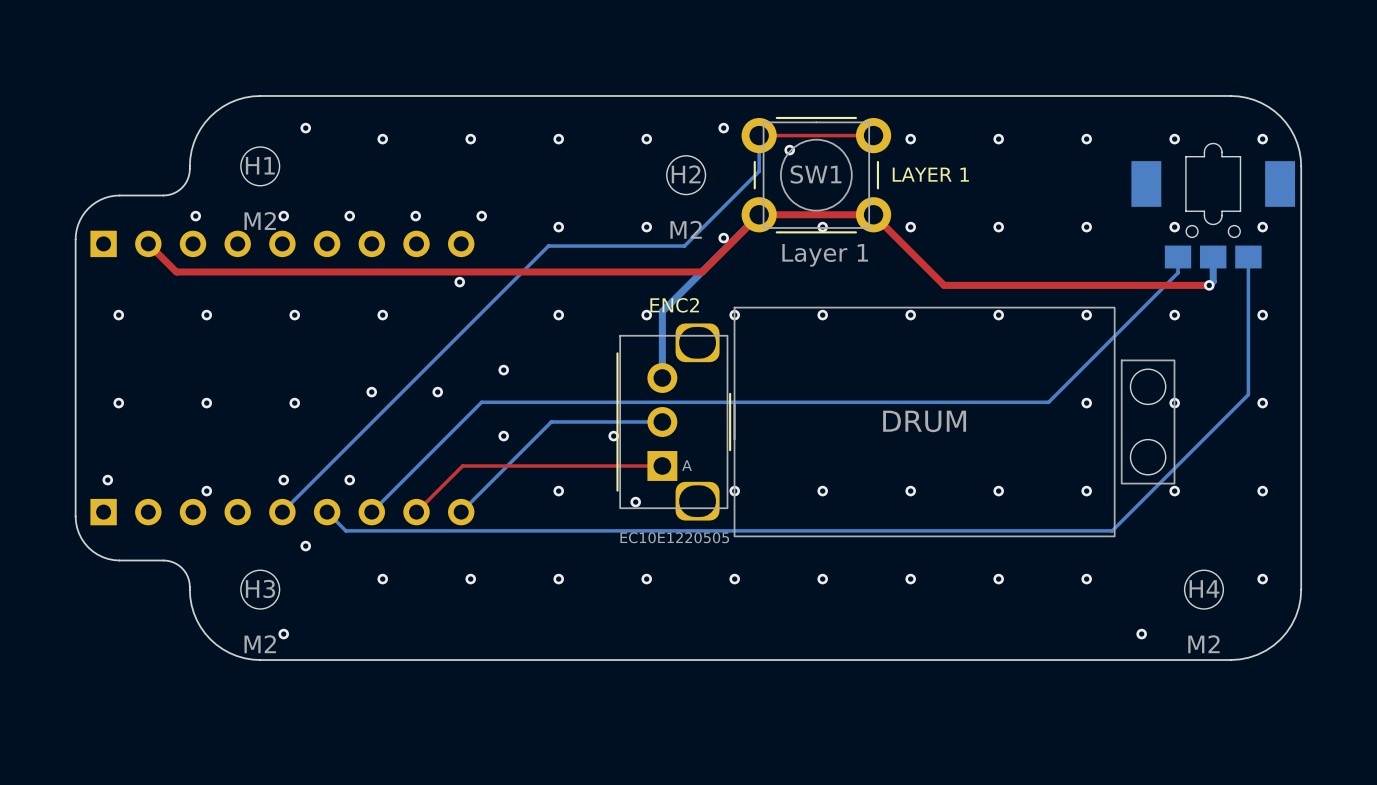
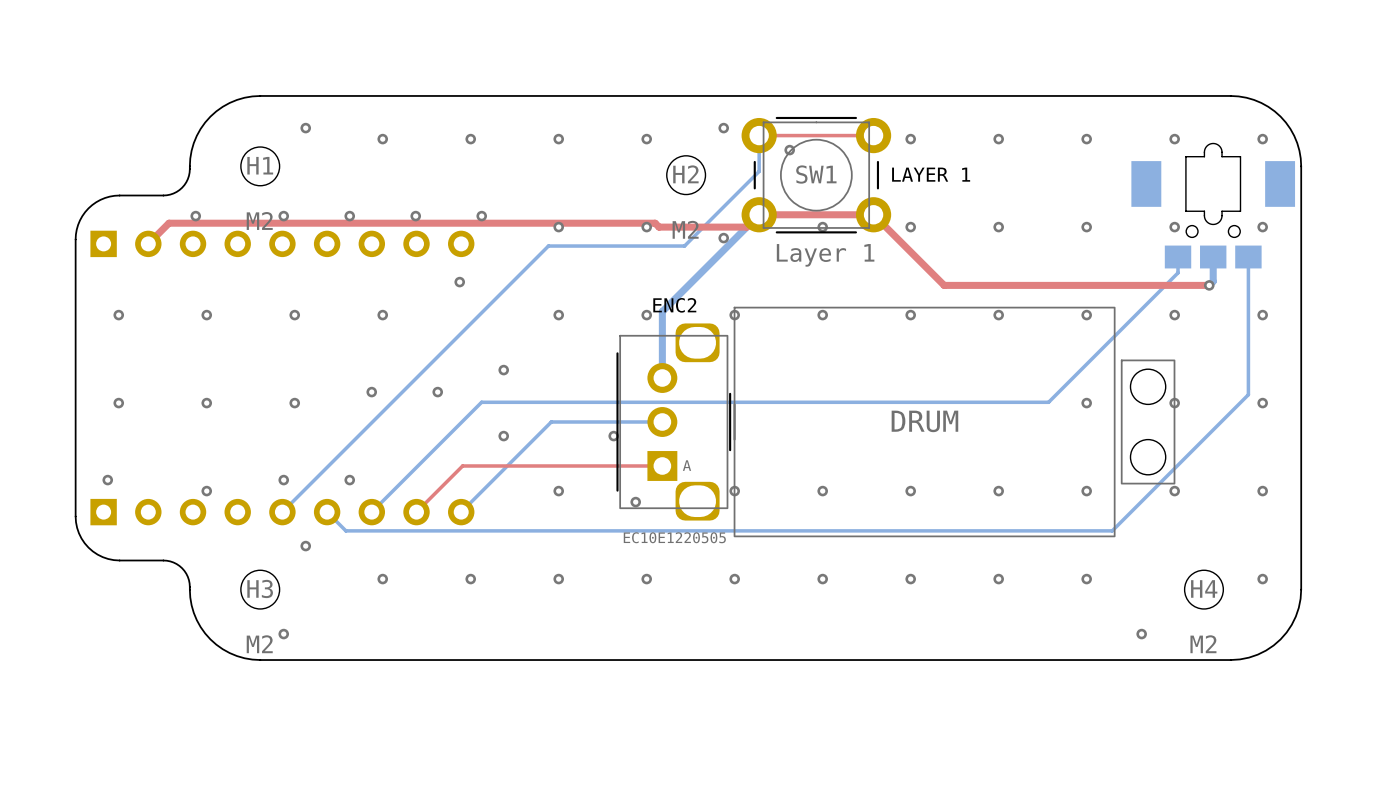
top track: (746, 227) (702, 271) (176, 271) (148, 243) -> (746, 227) (659, 227) (655, 223) (169, 223) (148, 243)

